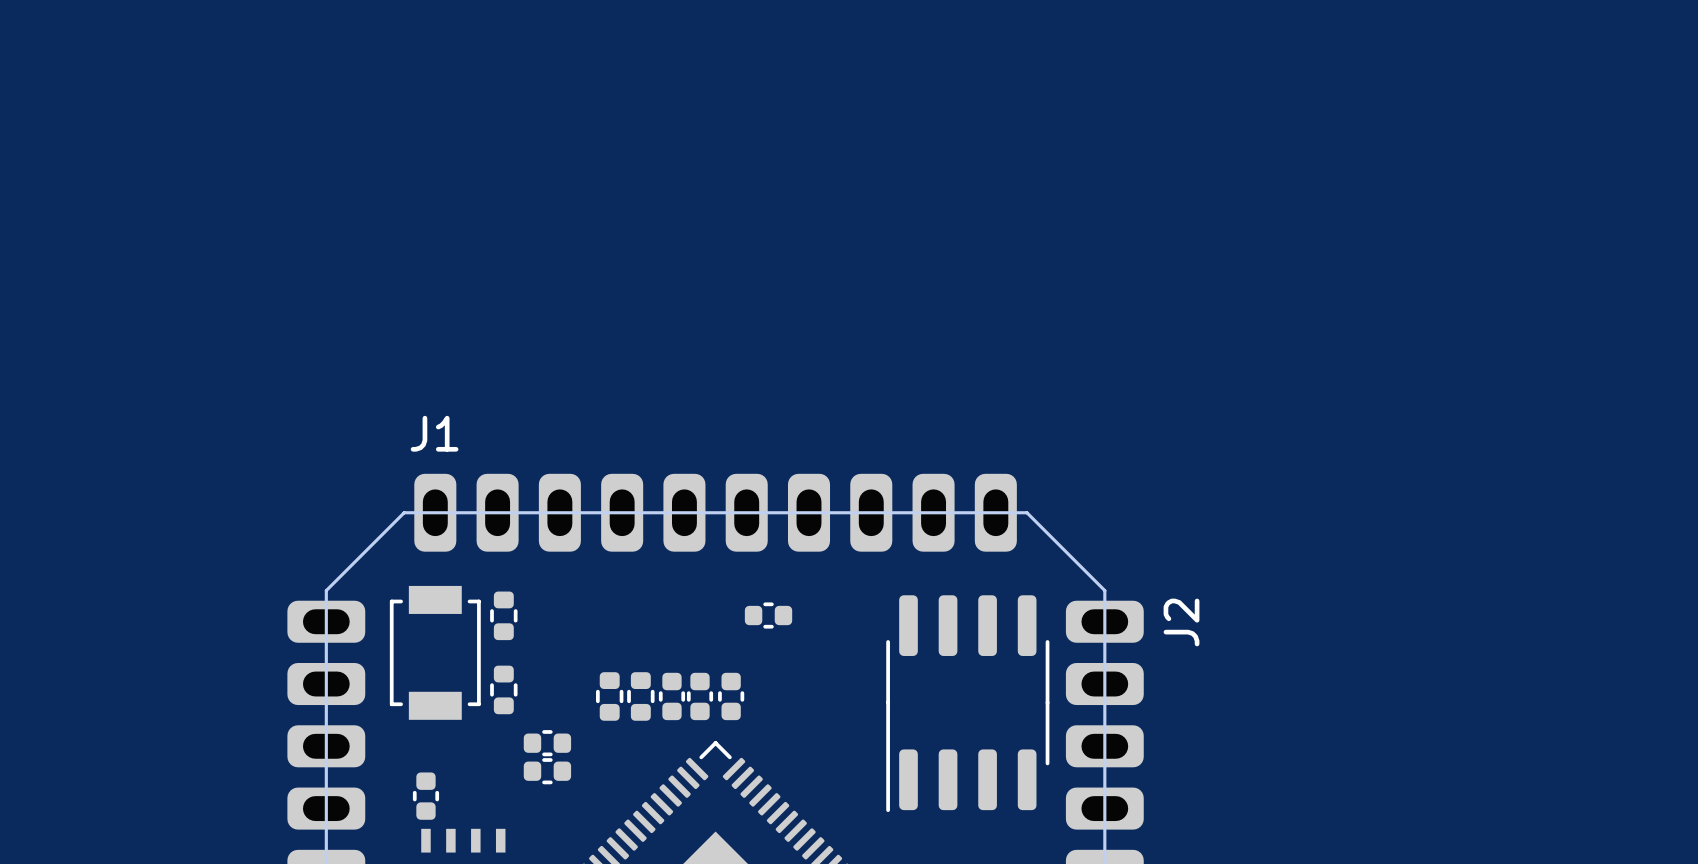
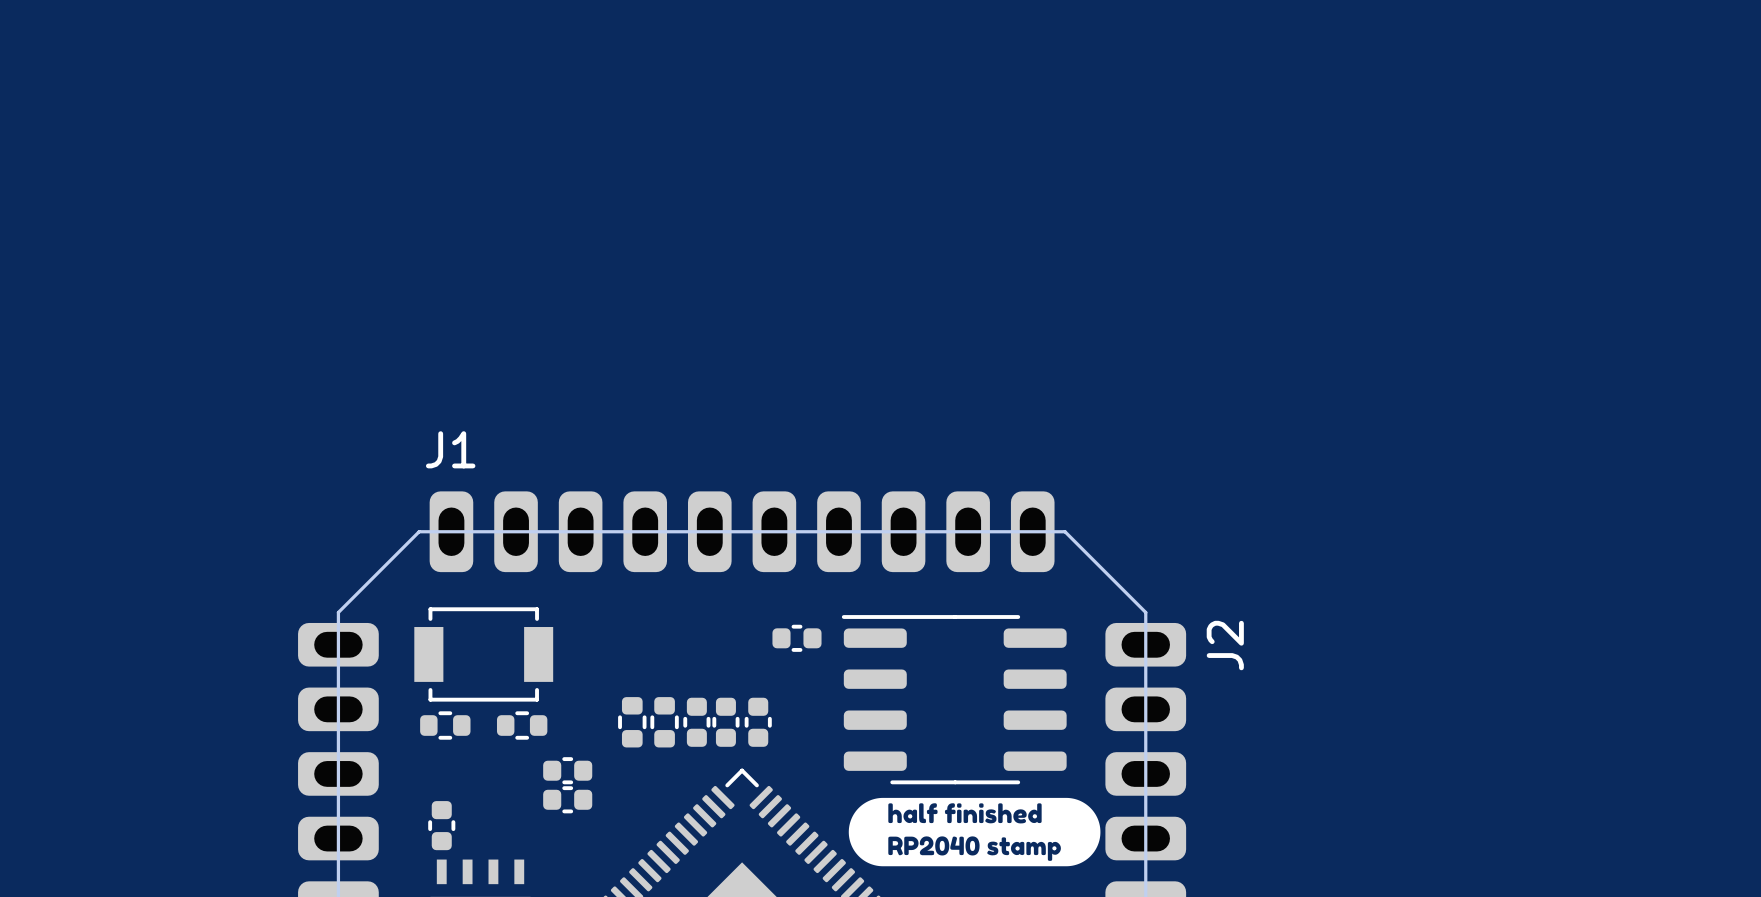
part rotation: 0° (503, 615) -> 90° clockwise (445, 725)
part position: (503, 615) -> (445, 725)
part rotation: 0° (435, 652) -> 90° clockwise (483, 654)
part rotation: 0° (503, 689) -> 90° clockwise (522, 725)
part rotation: 0° (967, 703) -> 90° clockwise (954, 699)
drawing: none -> [848, 797, 1101, 867]

